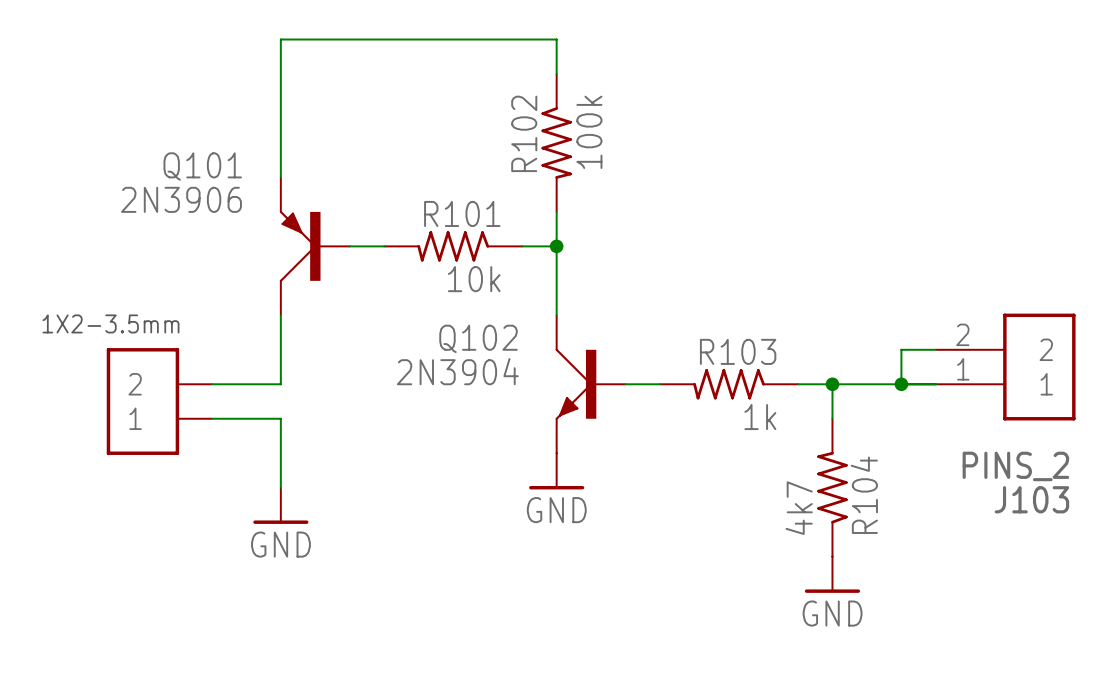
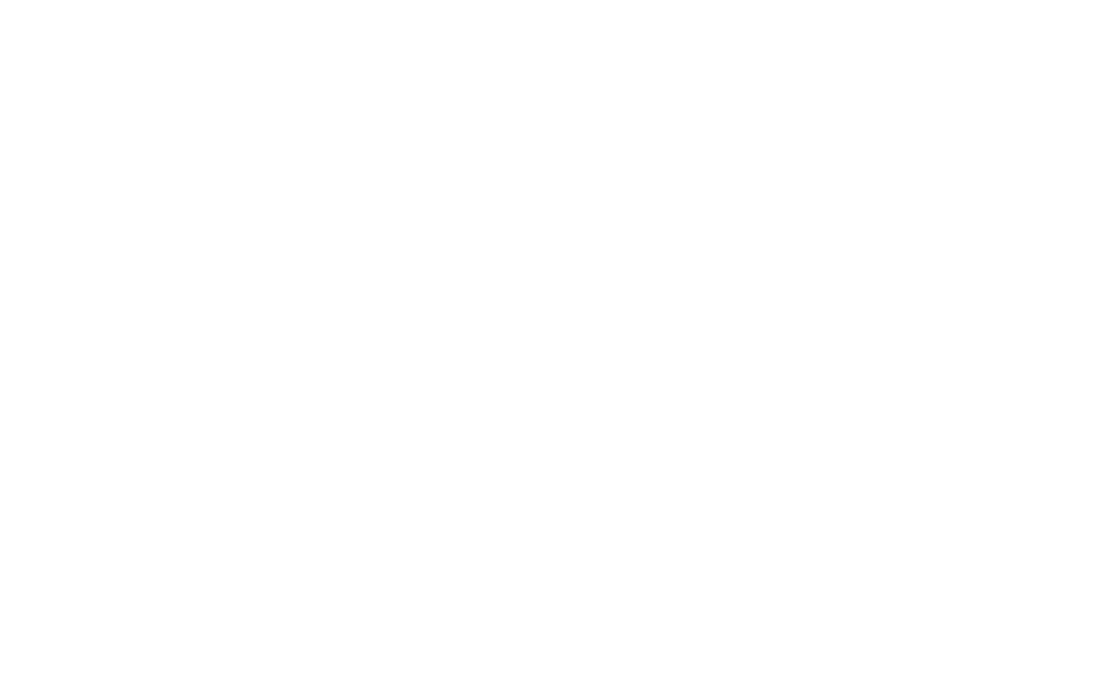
wire: (556, 73) (556, 39) (280, 39) (280, 177) -> none
R102: 100k (556, 142) -> none
wire: (556, 211) (556, 315) -> none
Q101: 2N3906 (314, 246) -> none
wire: (349, 246) (384, 246) -> none
R101: 10k (453, 246) -> none
wire: (522, 246) (556, 246) -> none
junction: (556, 246) -> none
wire: (280, 315) (280, 384) (211, 384) -> none
wire: (935, 349) (901, 349) (901, 384) -> none
J103: PINS_2 (1005, 367) -> none
Q102: 2N3904 (590, 384) -> none
wire: (625, 384) (660, 384) -> none
R103: 1k (729, 384) -> none
wire: (798, 384) (935, 384) -> none
wire: (832, 384) (832, 418) -> none
junction: (832, 384) -> none
junction: (901, 384) -> none
part: (159, 401) -> none
wire: (211, 418) (280, 418) (280, 487) -> none
power symbol: GND (556, 471) -> none
R104: 4k7 (832, 487) -> none
power symbol: GND (280, 505) -> none
power symbol: GND (832, 574) -> none

